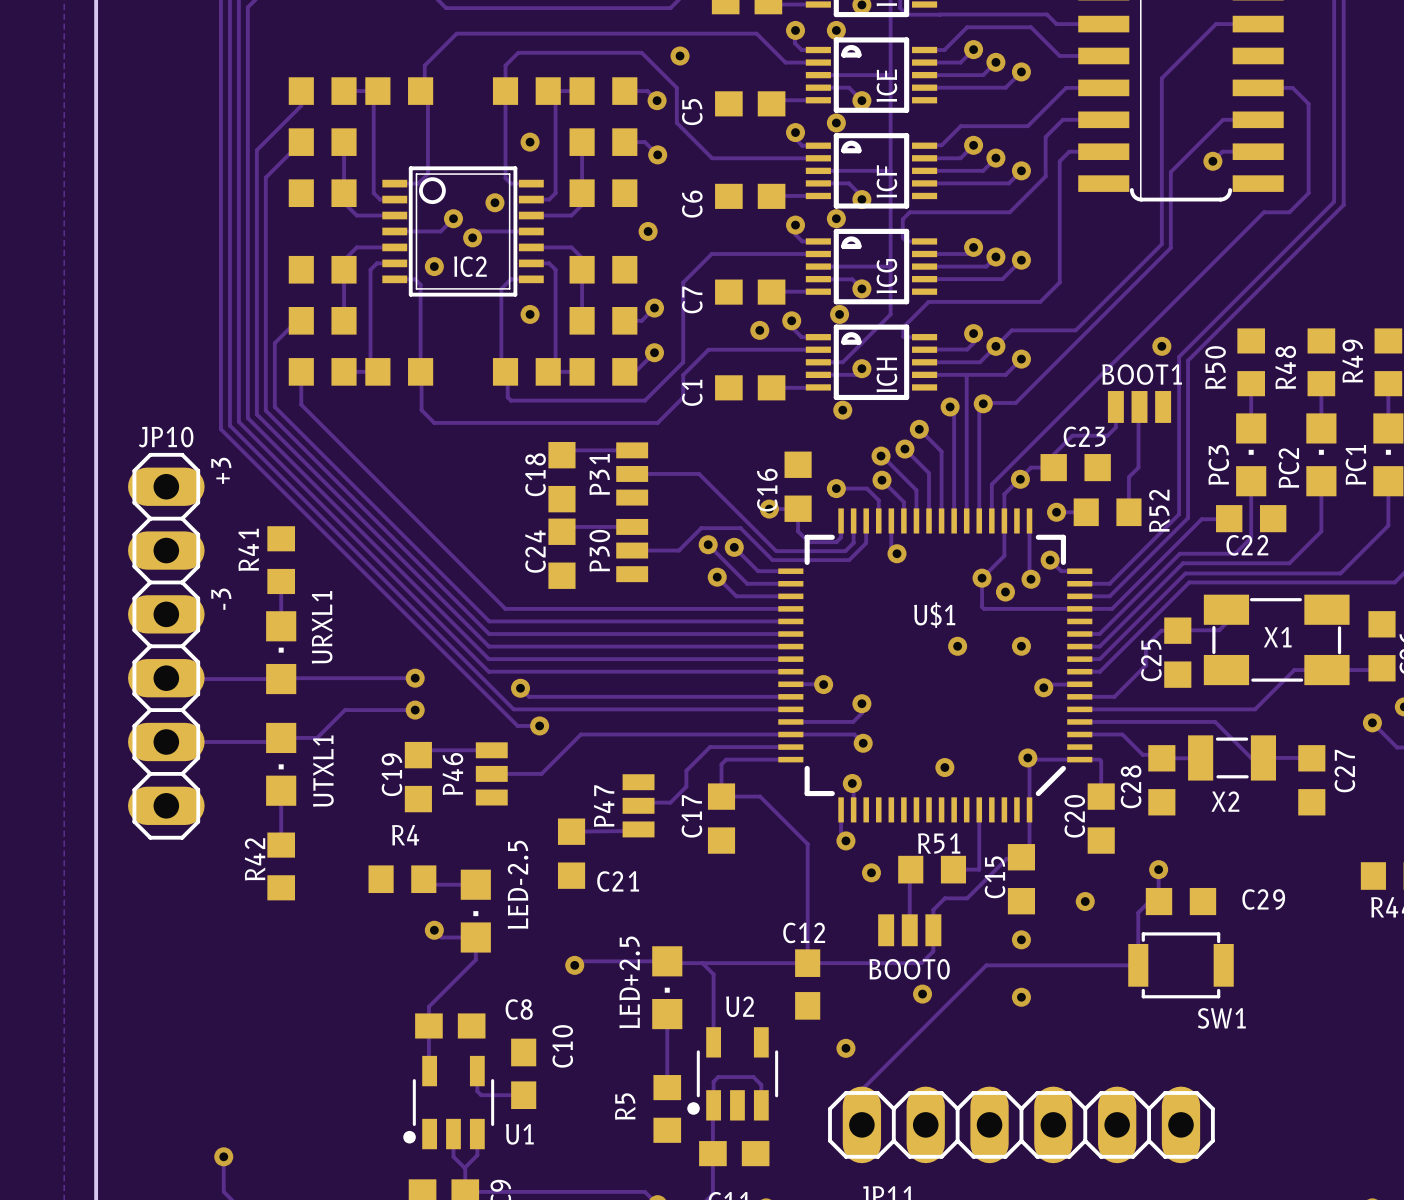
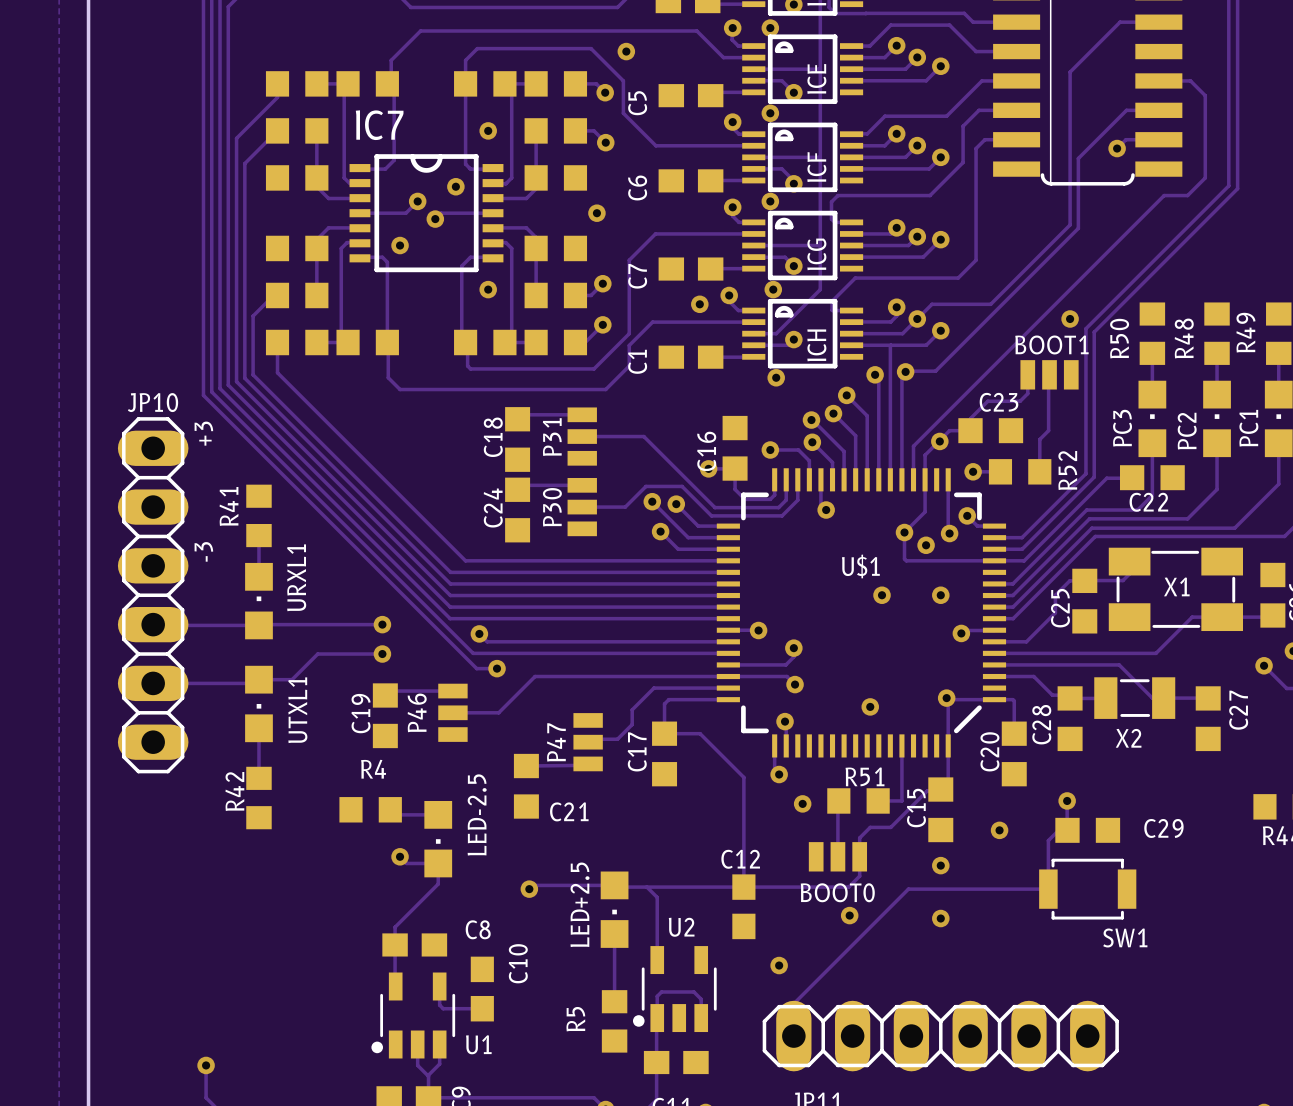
IC2: (463, 231) -> none
IC7: none -> (426, 213)

